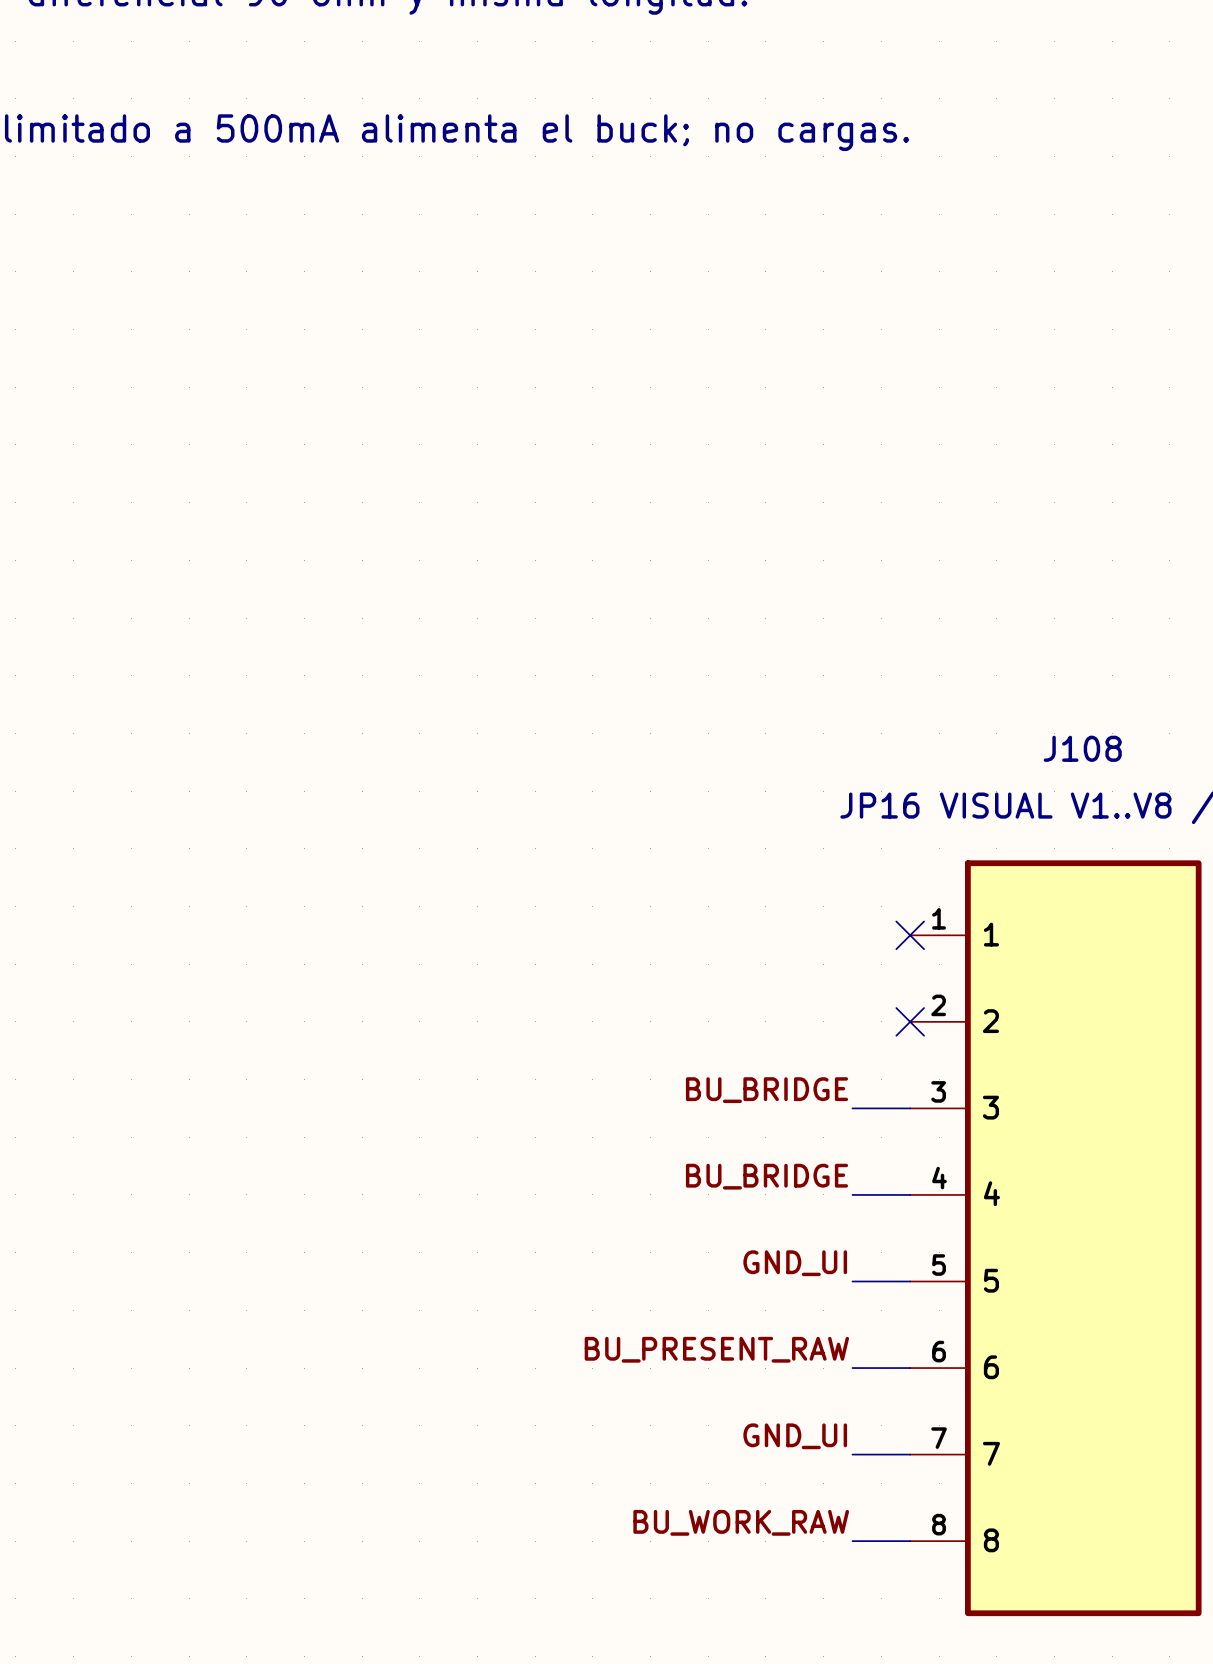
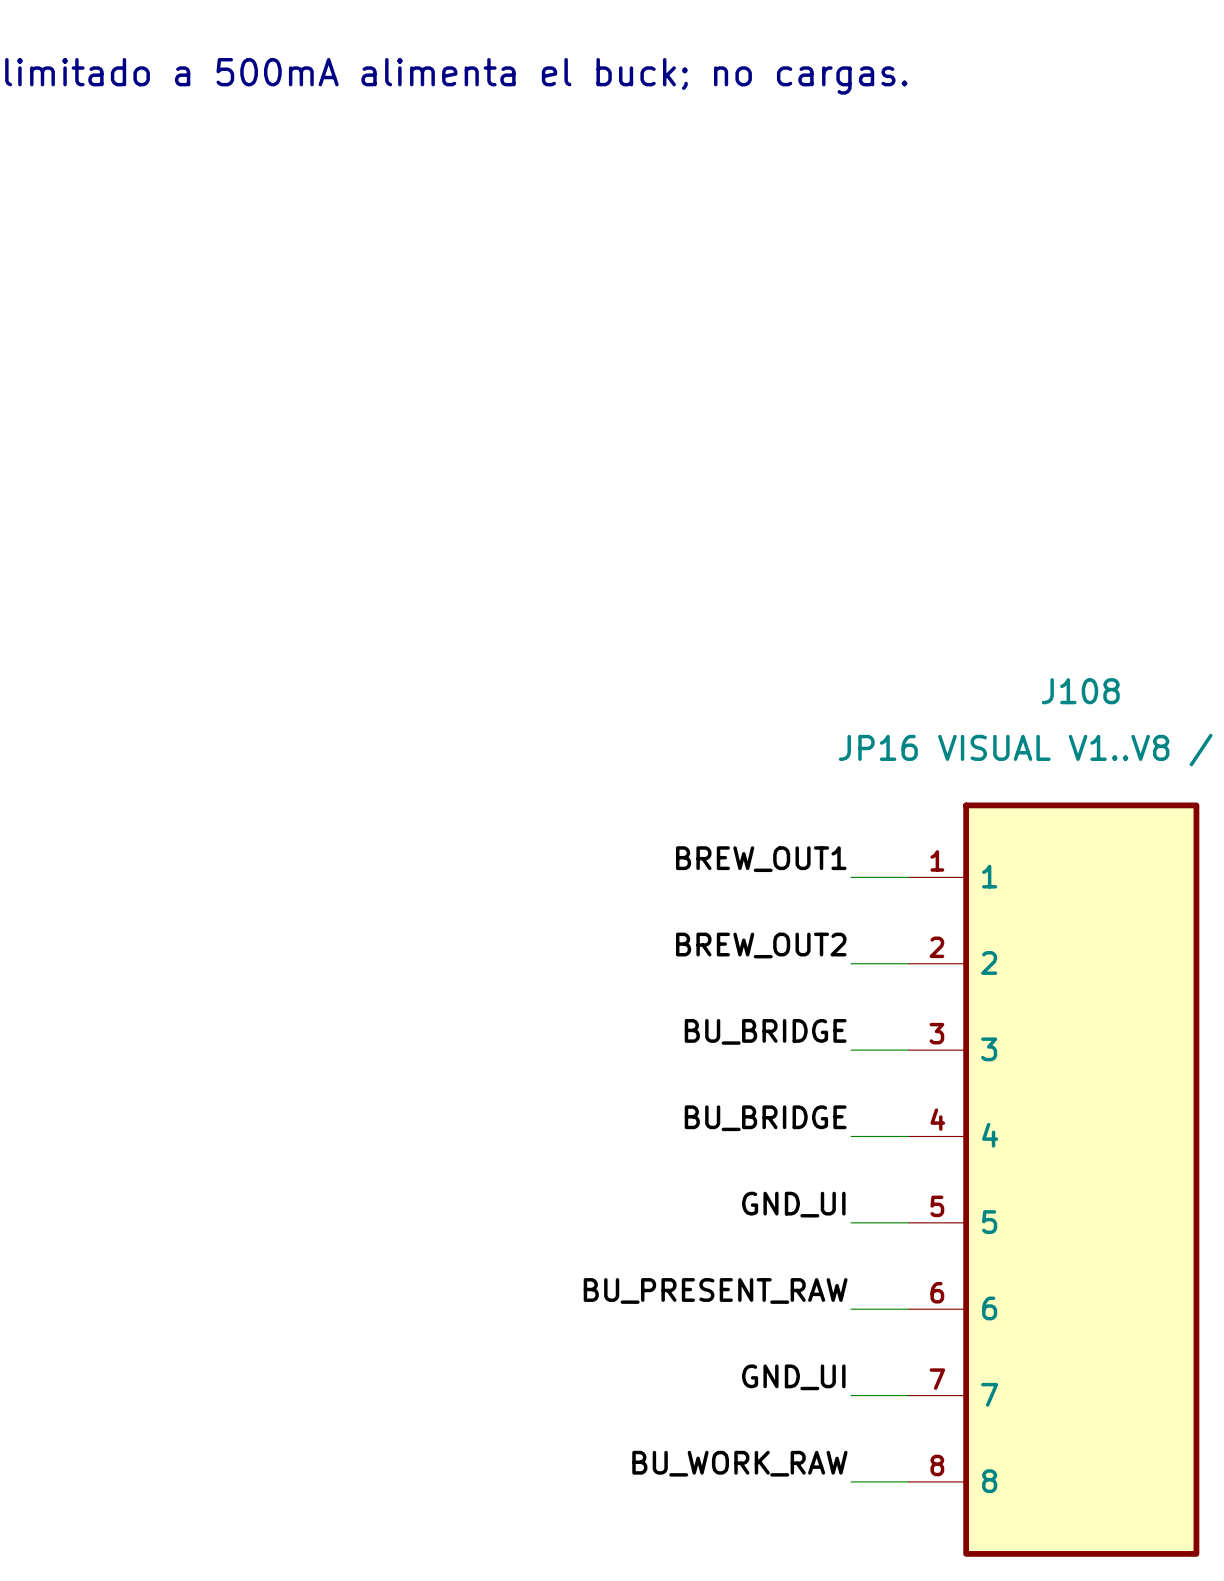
label: none -> BREW_OUT1 (761, 859)
wire: none -> (850, 877) (908, 877)
no-connect mark: (910, 935) -> none
label: none -> BREW_OUT2 (761, 945)
wire: none -> (850, 963) (908, 963)
no-connect mark: (910, 1021) -> none

